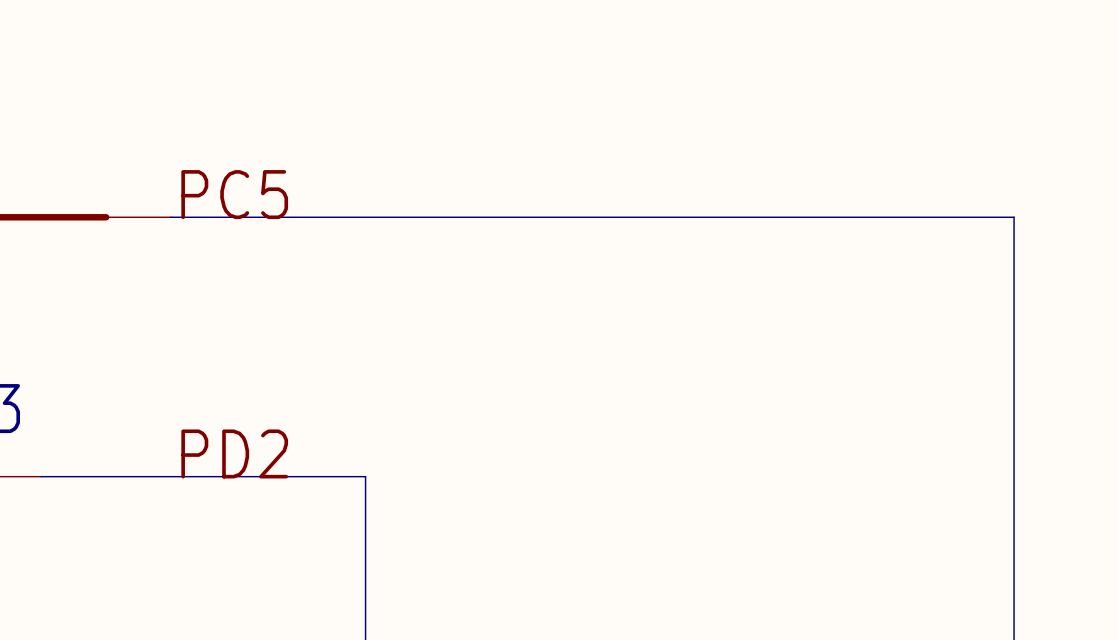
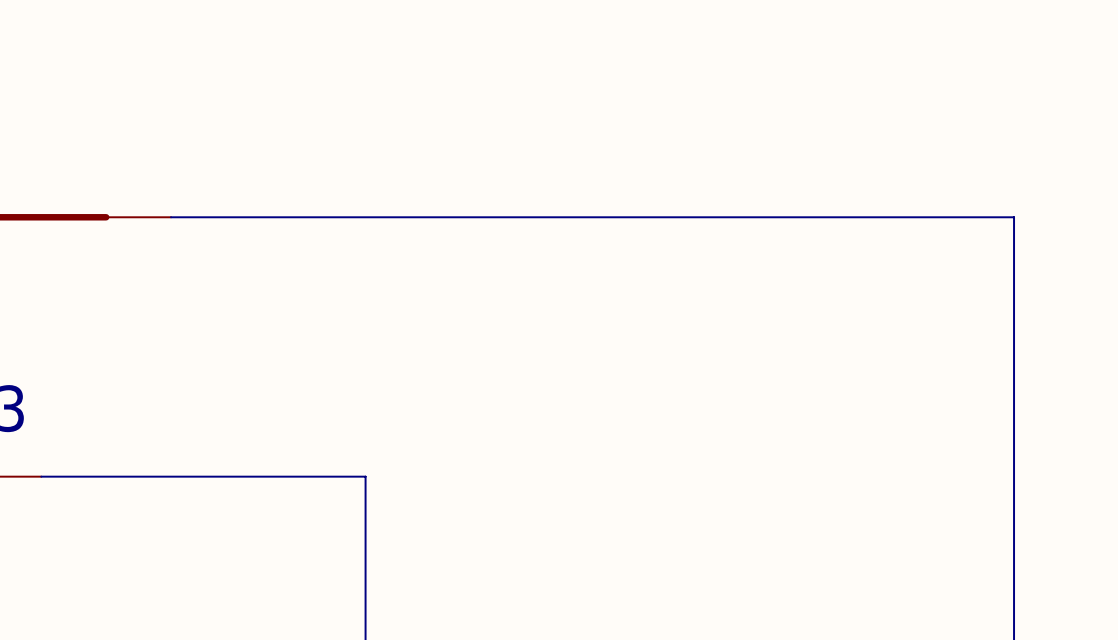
label: PC5 (234, 194) -> none
label: PD2 (234, 453) -> none

